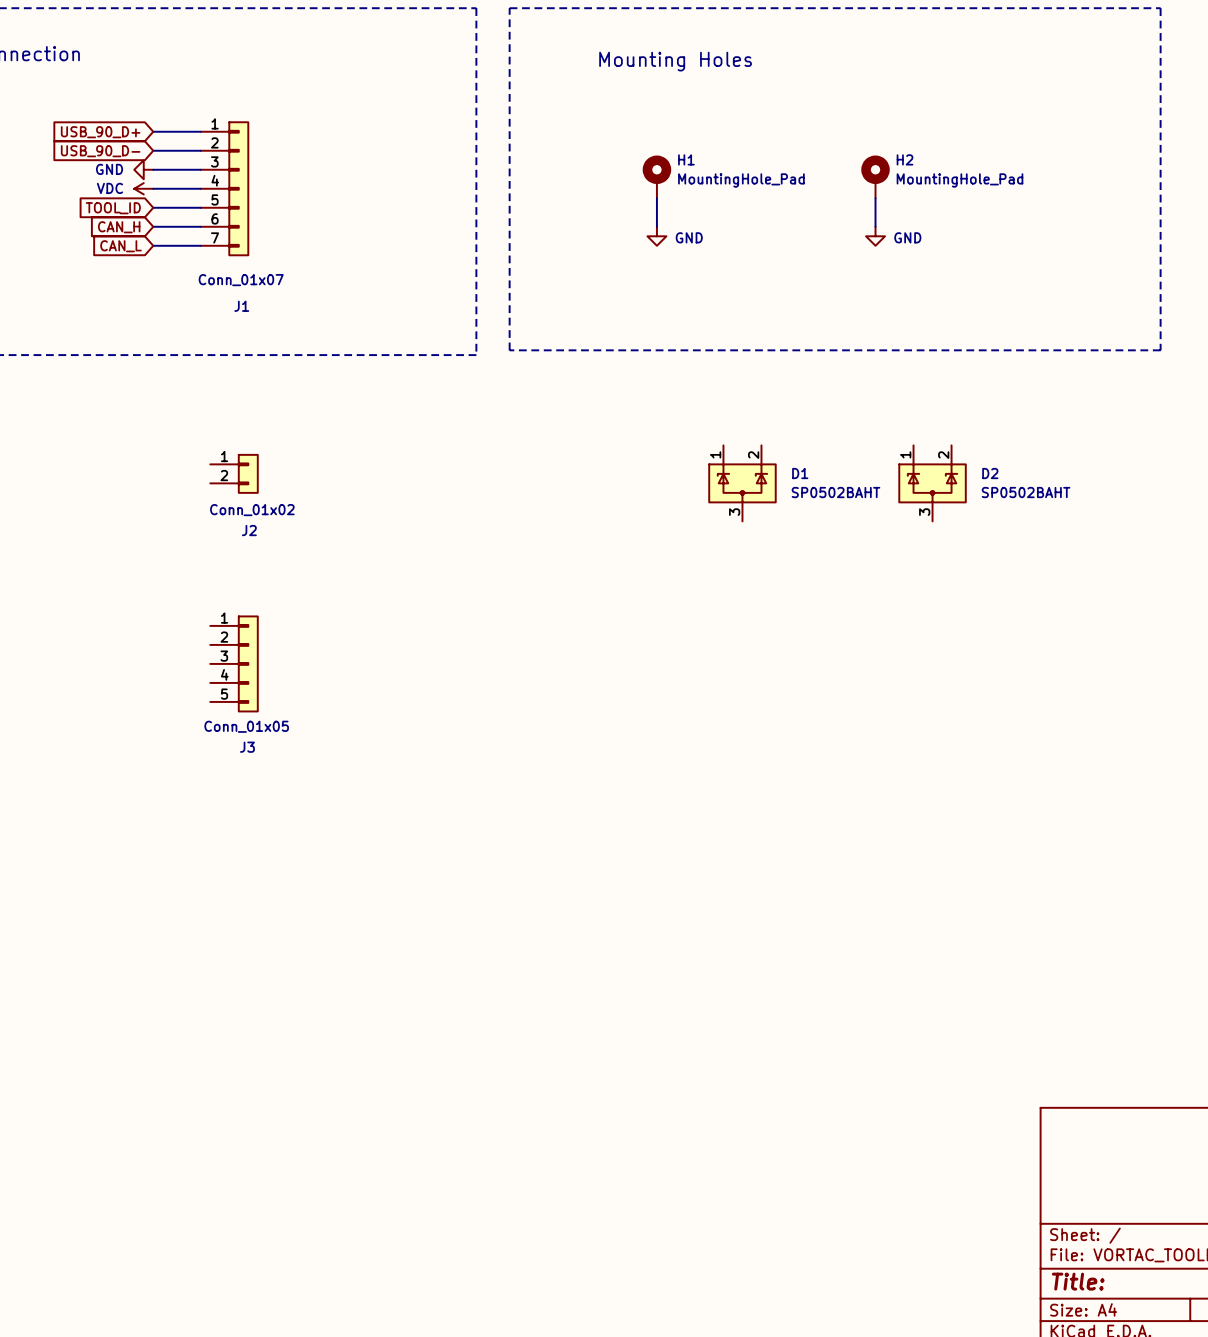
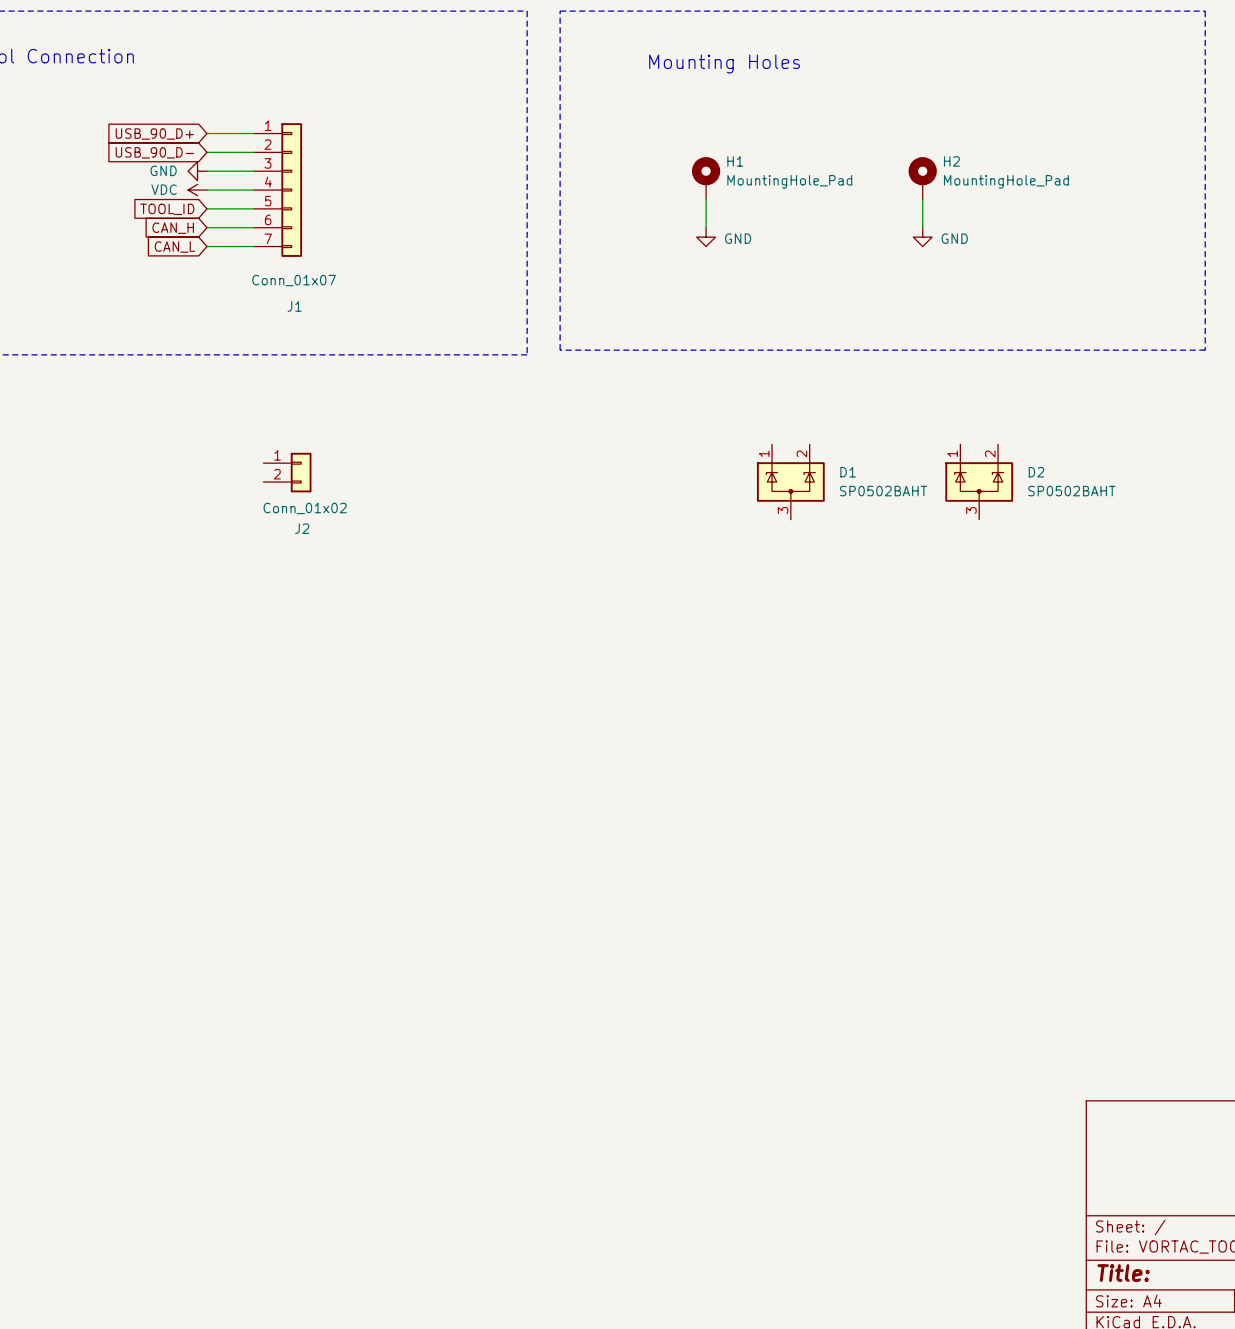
J3: Conn_01x05 (234, 663) -> none

